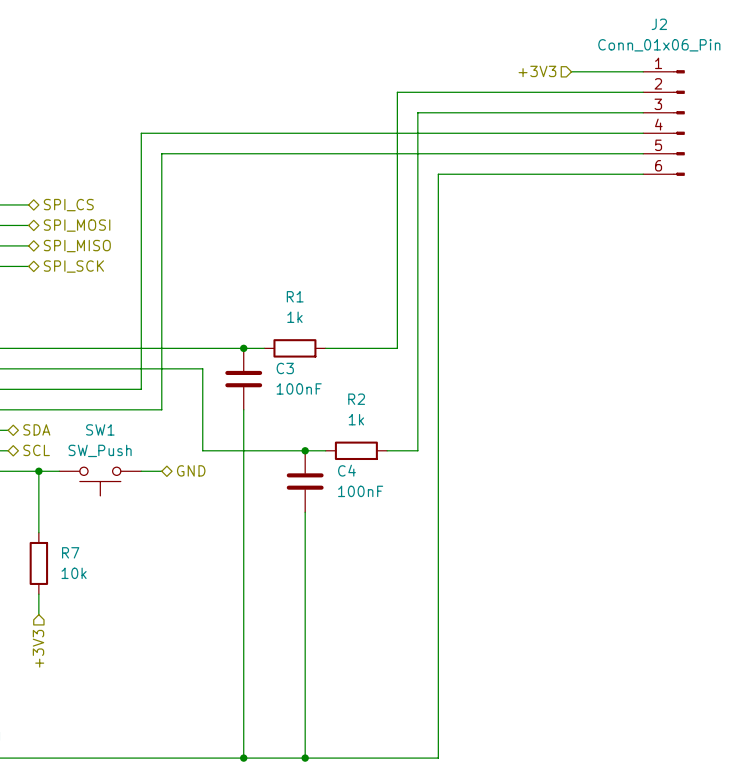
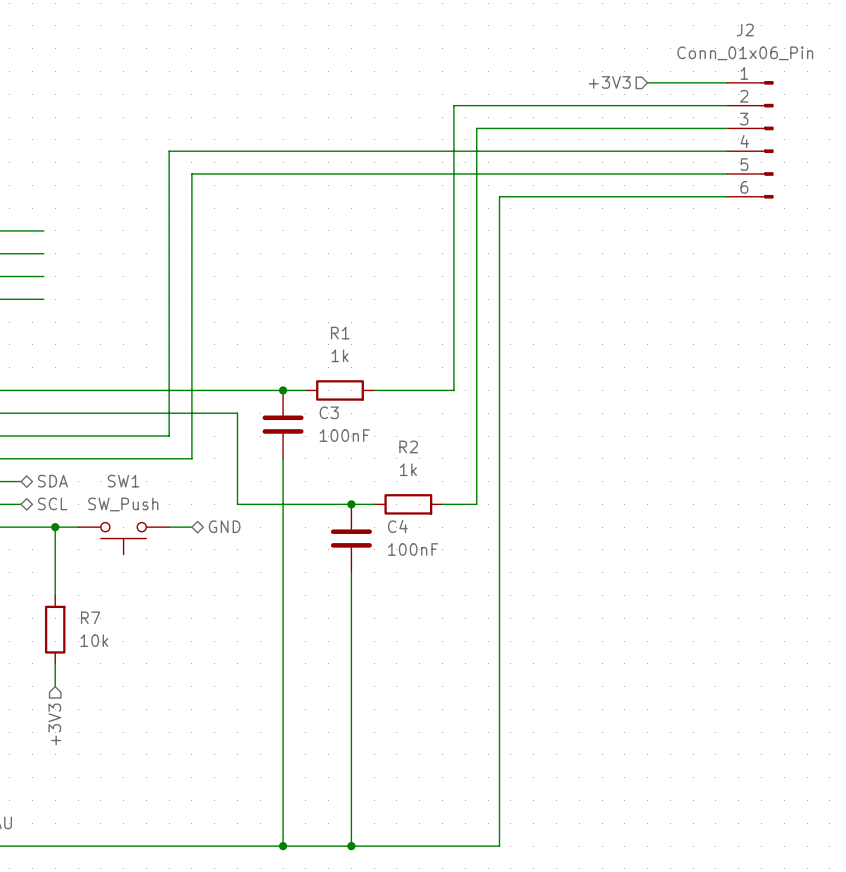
hierarchical label: SPI_CS (68, 205) -> none
hierarchical label: SPI_MOSI (77, 225) -> none
hierarchical label: SPI_MISO (77, 246) -> none
hierarchical label: SPI_SCK (73, 266) -> none

